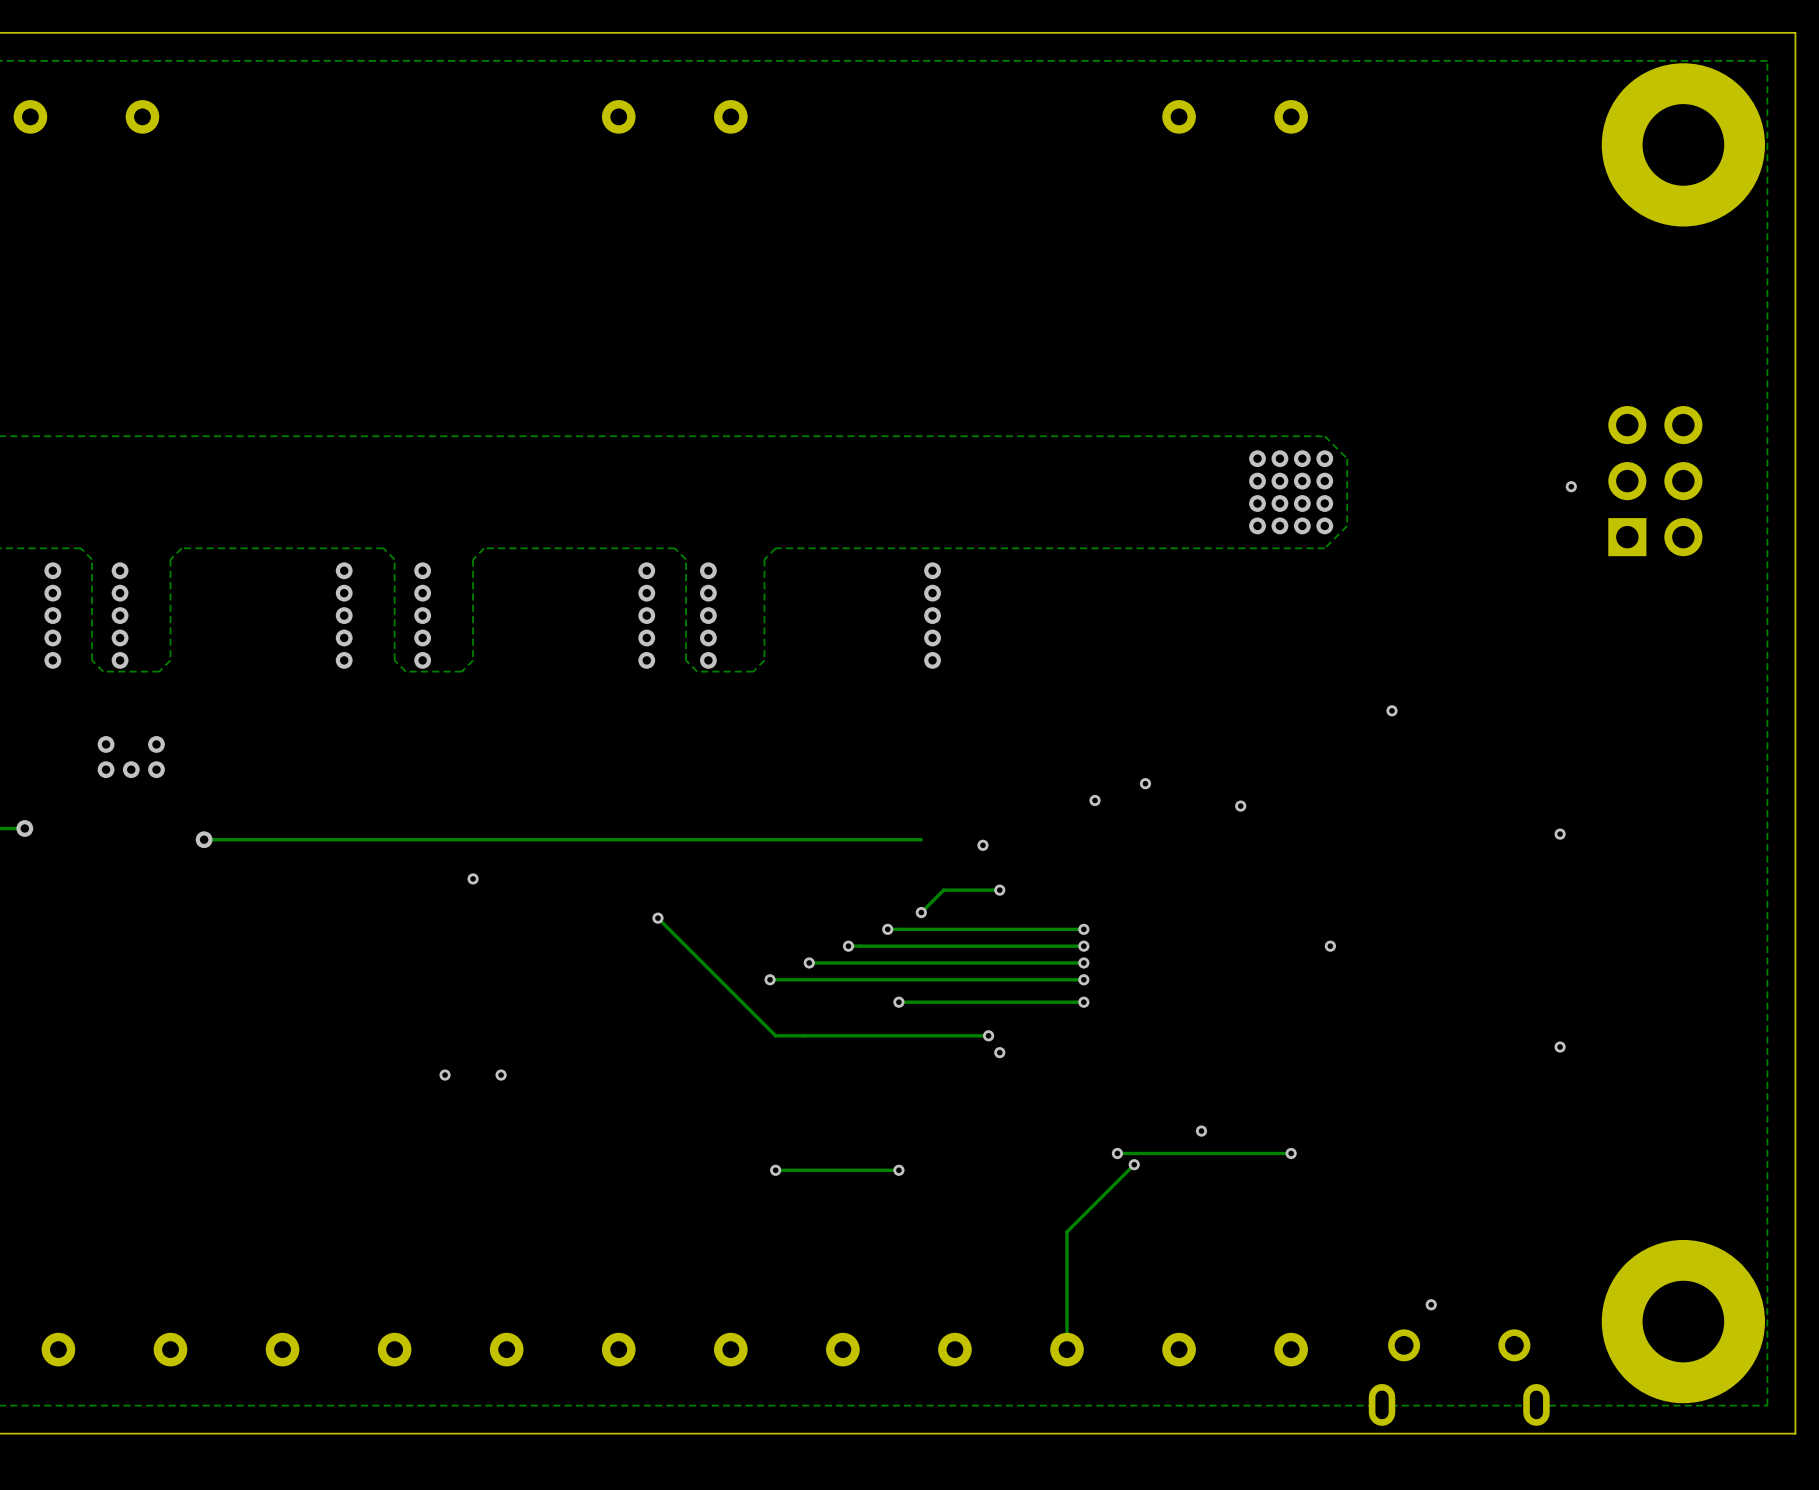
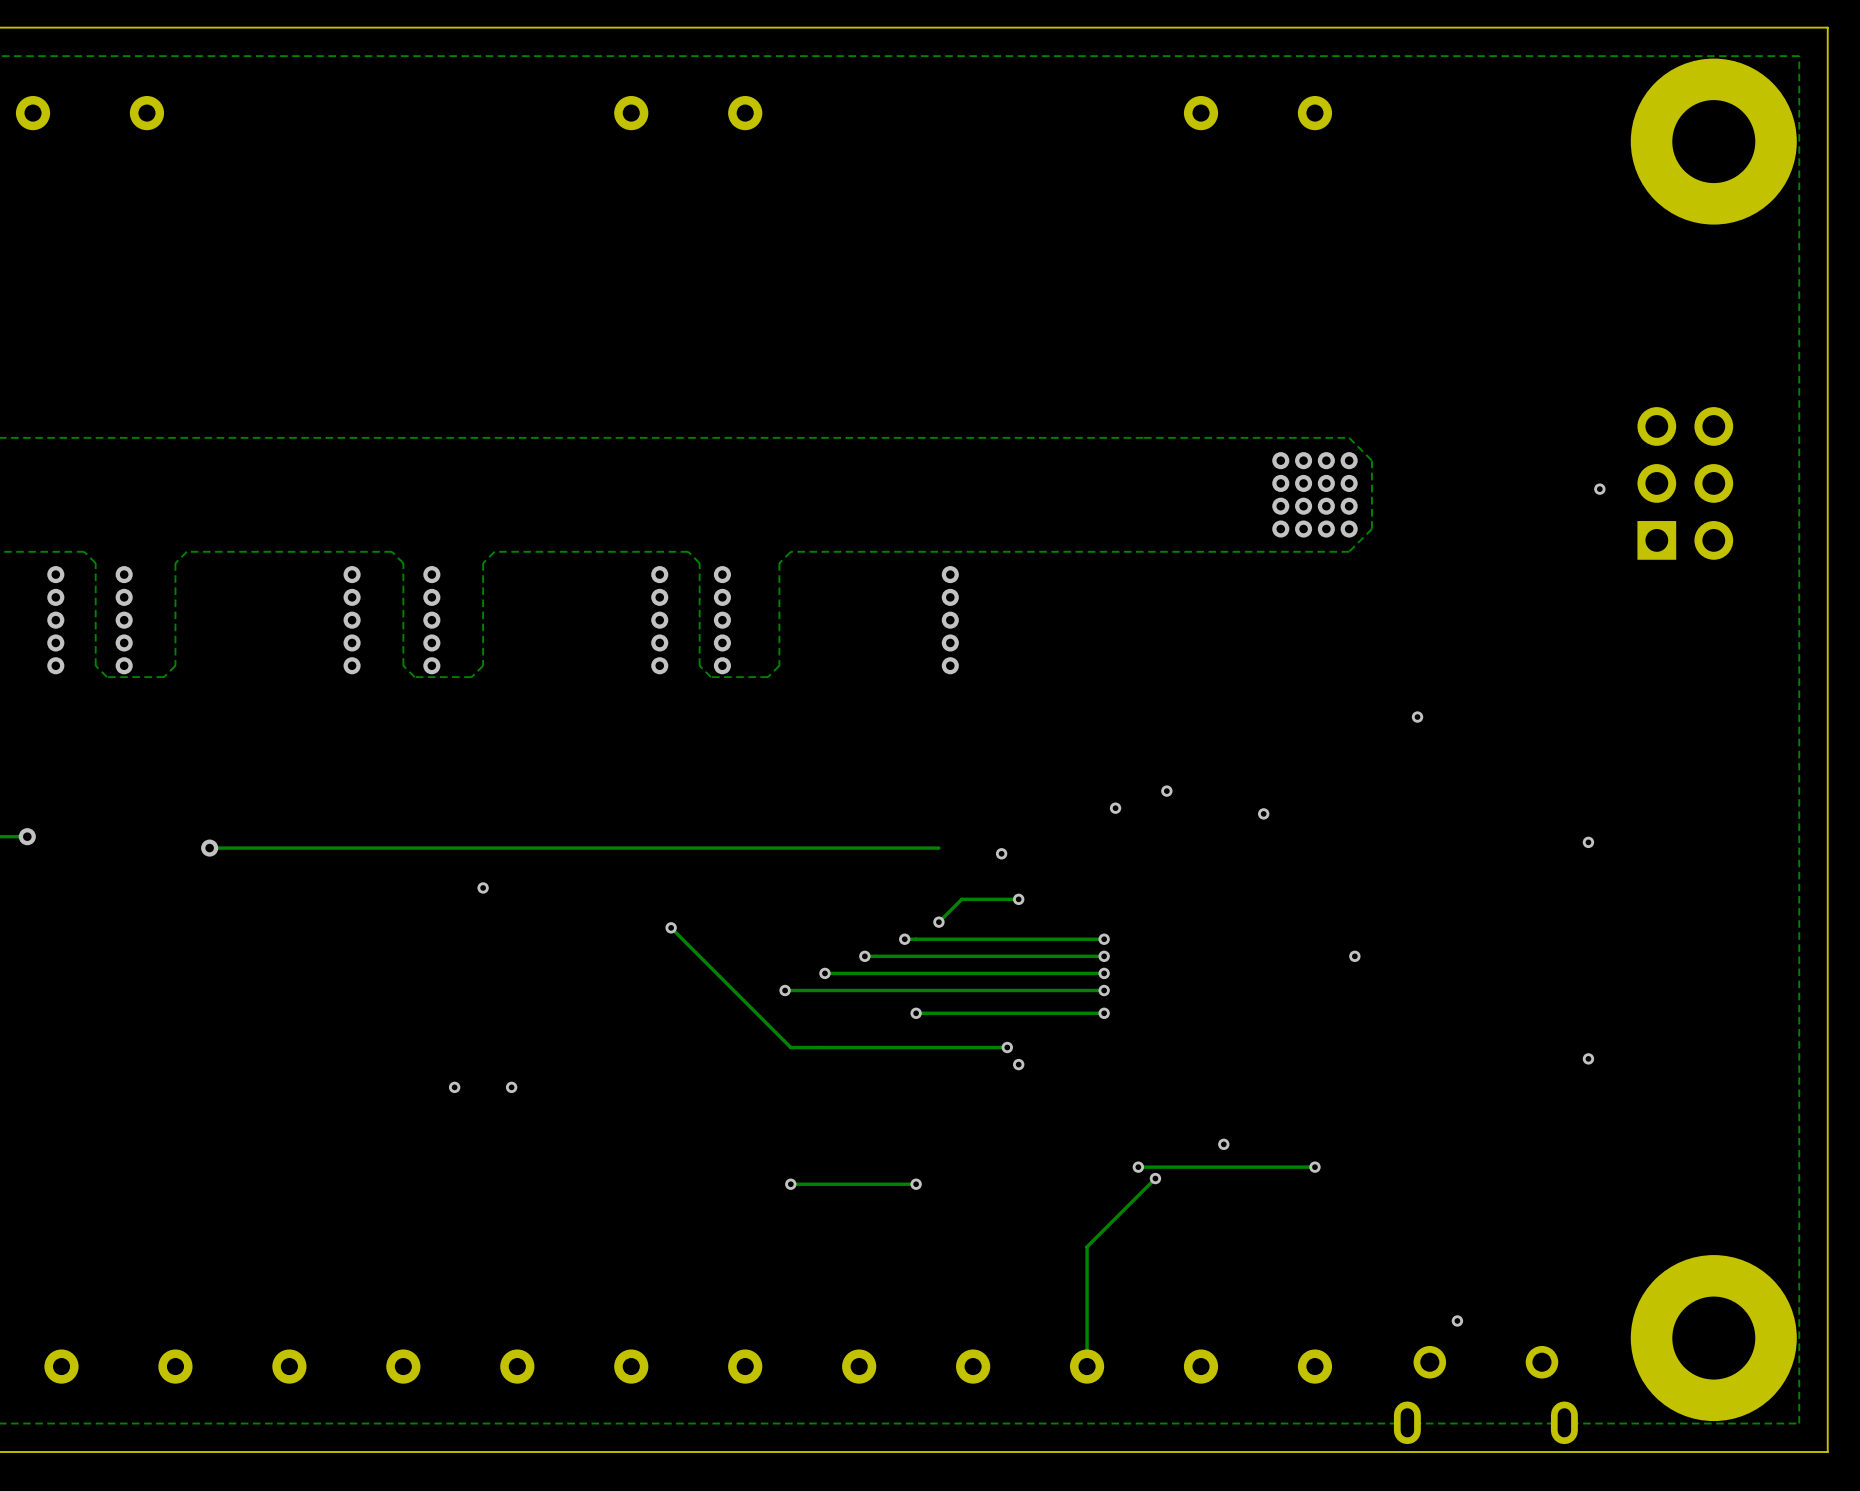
via: (106, 744) -> none
via: (156, 744) -> none
via: (106, 769) -> none
via: (131, 769) -> none
via: (156, 769) -> none

